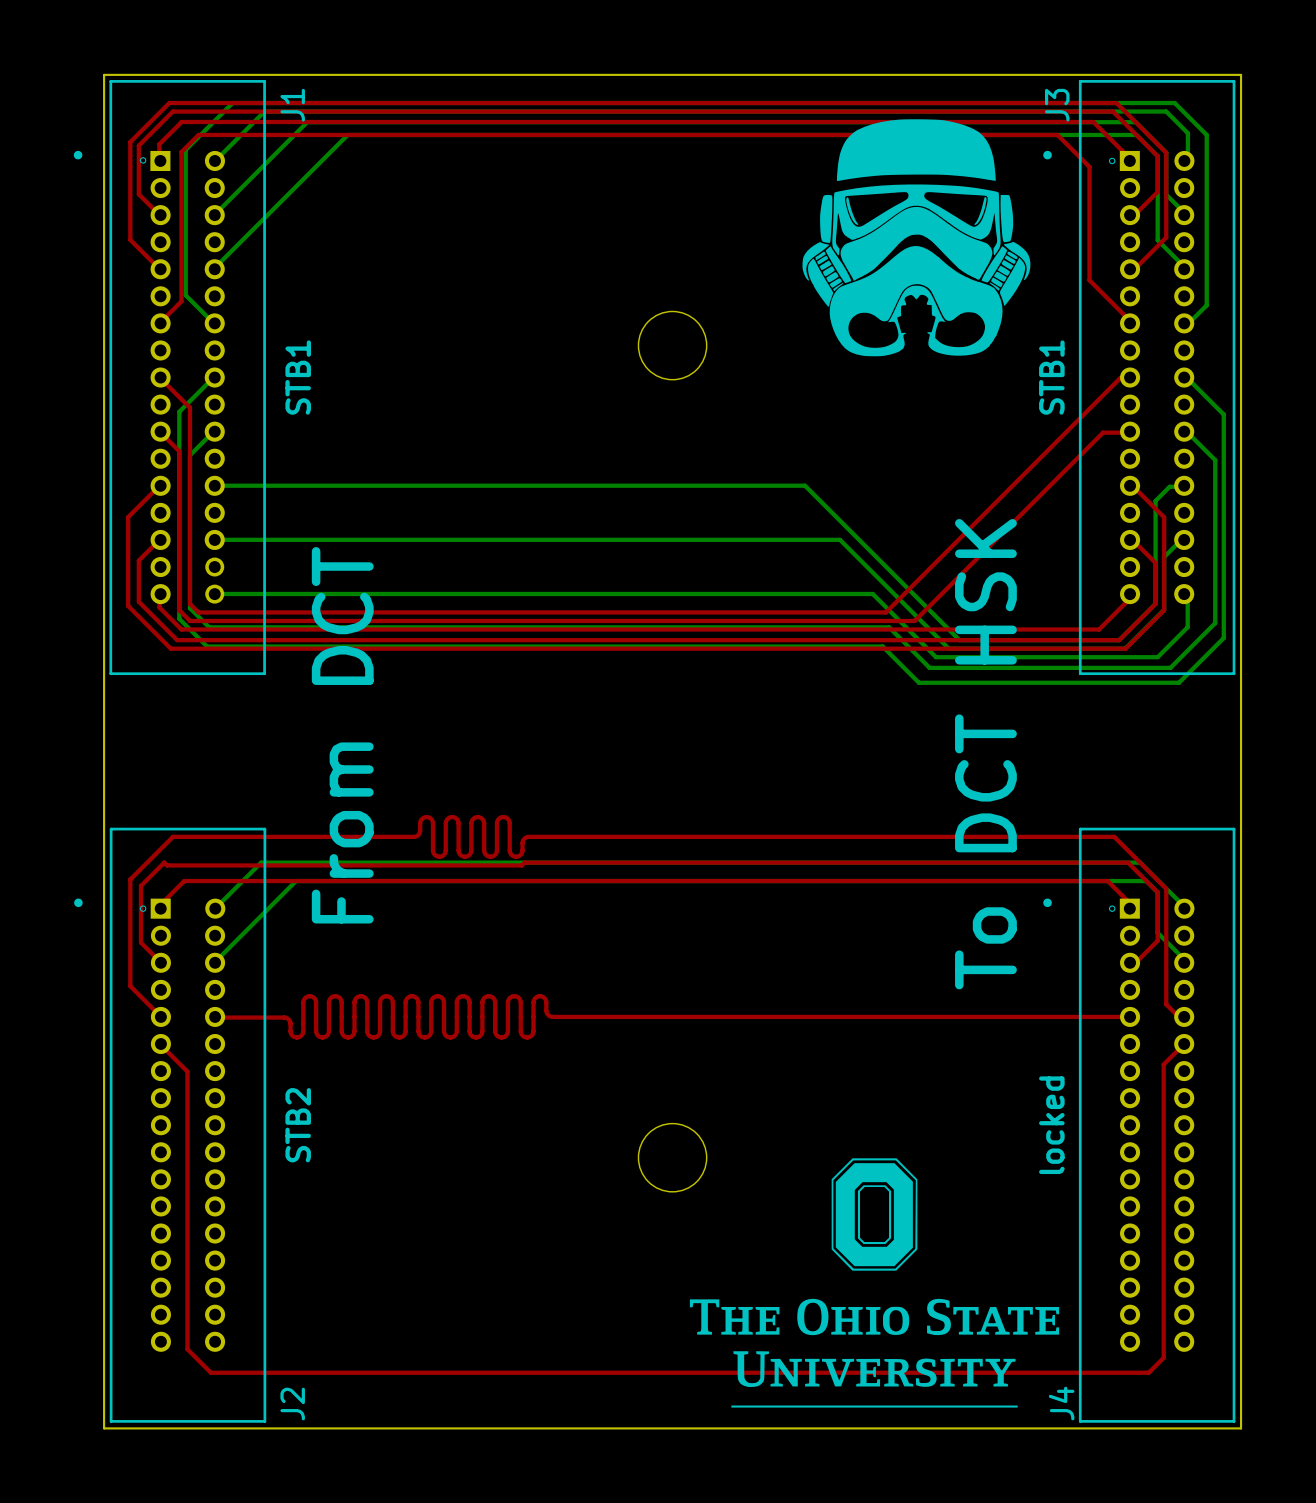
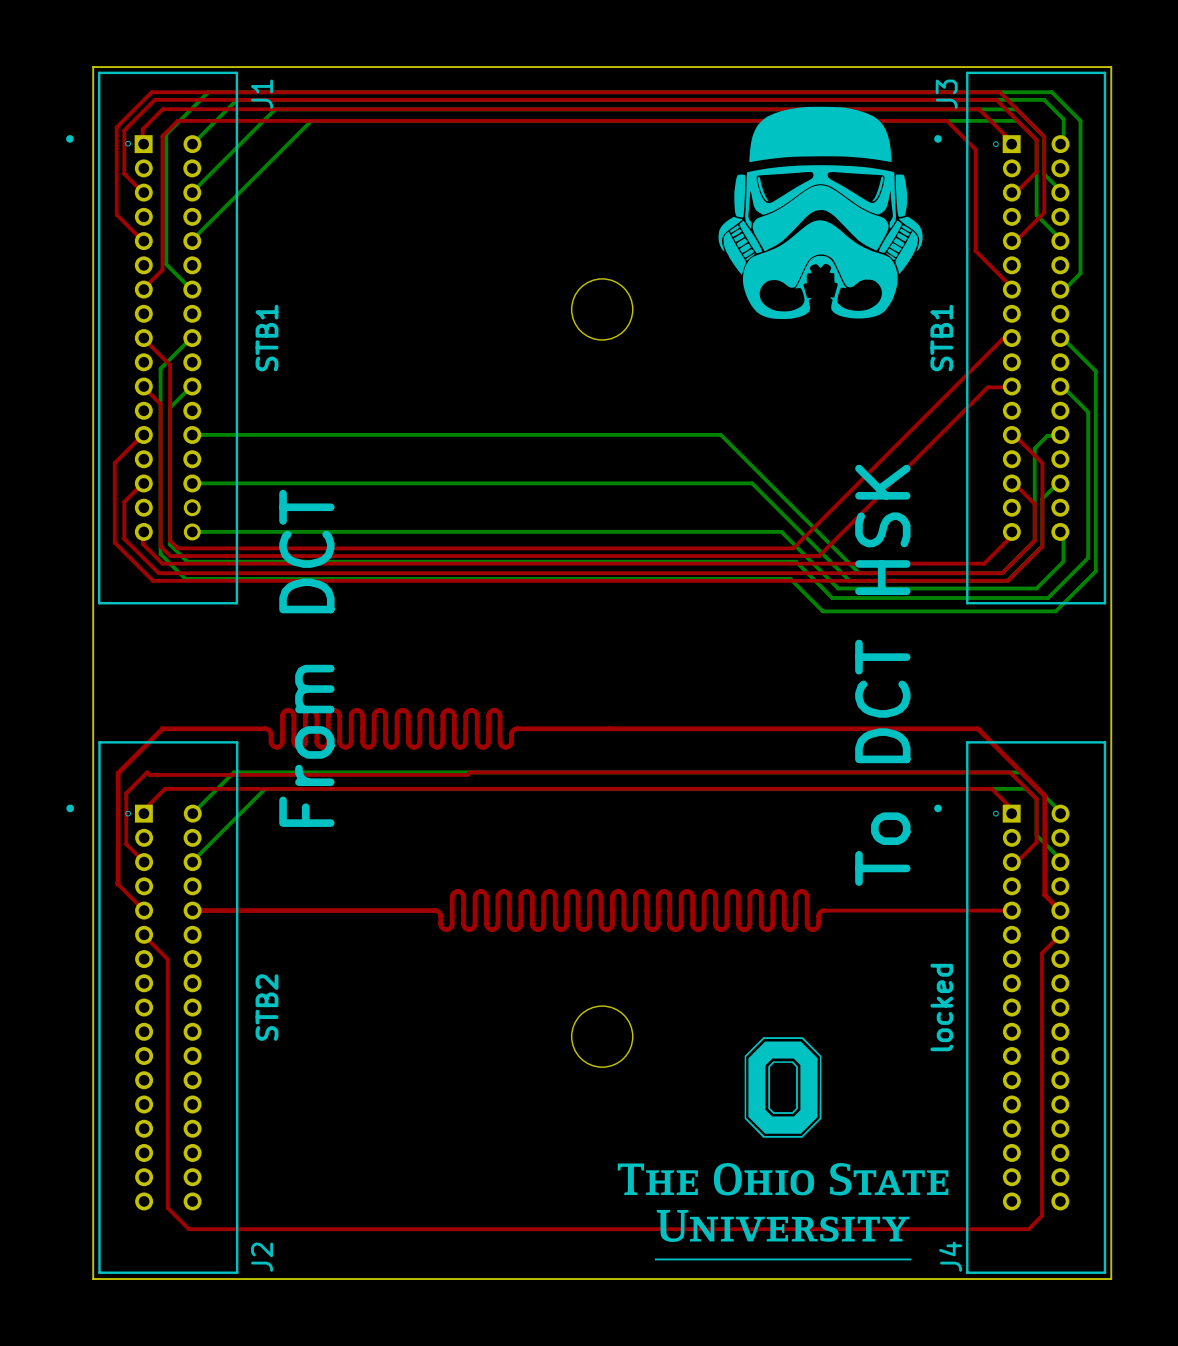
top track: (130, 986) (130, 879) (172, 836) (414, 836) (419, 832) (421, 820) (427, 817) (432, 822) (433, 851) (436, 855) (440, 856) (445, 851) (445, 821) (448, 817) (453, 817) (458, 822) (458, 851) (464, 856) (471, 851) (471, 822) (473, 818) (477, 817) (482, 818) (484, 822) (484, 851) (490, 856) (495, 854) (496, 851) (497, 821) (503, 817) (507, 818) (509, 822) (509, 851) (516, 856) (522, 852) (523, 840) (528, 836) (1114, 836) (1166, 888) (1166, 1004) (1178, 1017) (1189, 1017) -> none
top track: none -> (118, 884) (118, 773) (162, 728) (266, 728) (270, 732) (271, 744) (277, 747) (282, 742) (282, 714) (288, 710) (293, 715) (294, 742) (300, 747) (305, 742) (305, 714) (311, 710) (316, 715) (317, 742) (323, 747) (328, 742) (328, 714) (334, 710) (339, 715) (339, 742) (346, 747) (351, 742) (351, 714) (357, 710) (362, 715) (362, 742) (369, 747) (374, 742) (374, 714) (380, 710) (385, 715) (385, 742) (392, 747) (396, 742) (397, 714) (403, 710) (408, 715) (408, 742) (414, 747) (419, 742) (420, 714) (426, 710) (431, 715) (431, 742) (437, 747) (442, 742) (442, 715) (448, 710) (454, 714) (454, 742) (459, 747) (465, 742) (465, 714) (471, 710) (476, 714) (477, 742) (482, 747) (488, 742) (488, 715) (494, 710) (499, 714) (500, 742) (505, 747) (510, 744) (511, 732) (517, 728) (977, 728) (1044, 795) (1044, 894) (1060, 910)
top track: (552, 1016) (920, 1016) -> (192, 910) (435, 910) (440, 914) (441, 926) (446, 929) (452, 924) (452, 895) (457, 891) (463, 896) (463, 925) (469, 929) (474, 925) (475, 896) (480, 891) (486, 896) (486, 925) (492, 929) (497, 925) (498, 896) (503, 891) (509, 895) (509, 924) (515, 929) (520, 924) (521, 895) (526, 891) (532, 896) (532, 925) (538, 929) (543, 925) (543, 896) (548, 891) (555, 895) (555, 924) (560, 929) (566, 925) (566, 896) (571, 891) (577, 895) (578, 924) (583, 929) (589, 925) (589, 896) (594, 891) (600, 895) (601, 924) (606, 929) (612, 925) (612, 896) (617, 891) (623, 895) (623, 924) (628, 929) (635, 925) (635, 896) (640, 891) (646, 895) (646, 924) (651, 929) (658, 925) (658, 896) (663, 891) (669, 895) (669, 924) (674, 929) (680, 925) (681, 896) (686, 891) (692, 895) (692, 924) (697, 929) (703, 925) (704, 896) (709, 891) (715, 895) (715, 924) (720, 929) (726, 925) (727, 896) (731, 891) (738, 895) (738, 924) (742, 929) (747, 928) (749, 925) (749, 896) (754, 891) (758, 892) (761, 895) (761, 924) (765, 929) (769, 928) (772, 925) (772, 896) (777, 891) (781, 892) (784, 895) (784, 924) (787, 929) (792, 929) (795, 925) (795, 896) (798, 892) (803, 891) (806, 895) (807, 924) (809, 928) (813, 929) (817, 927) (819, 914) (824, 910)
top track: (552, 1016) (546, 1012) (544, 998) (540, 996) (536, 997) (533, 1001) (533, 1032) (529, 1037) (523, 1036) (520, 1031) (520, 1000) (516, 996) (511, 996) (508, 1001) (507, 1032) (504, 1036) (499, 1037) (495, 1031) (494, 1000) (491, 997) (487, 996) (482, 1001) (482, 1032) (479, 1036) (474, 1037) (469, 1031) (469, 1000) (466, 997) (461, 996) (456, 1001) (456, 1032) (453, 1036) (449, 1037) (444, 1031) (443, 1000) (440, 997) (436, 996) (431, 1001) (430, 1032) (428, 1036) (423, 1037) (418, 1031) (418, 1000) (415, 997) (411, 996) (405, 1001) (405, 1032) (402, 1036) (398, 1037) (392, 1031) (392, 1000) (389, 997) (385, 996) (380, 1001) (379, 1032) (376, 1036) (372, 1037) (367, 1031) (367, 1000) (364, 997) (360, 996) (354, 1001) (354, 1032) (351, 1036) (347, 1037) (341, 1031) (341, 1000) (338, 997) (334, 996) (328, 1001) (328, 1032) (325, 1036) (321, 1037) (316, 1031) (315, 1000) (309, 996) (303, 1000) (303, 1031) (300, 1036) (296, 1037) (291, 1034) (290, 1023) -> none
top track: (215, 1017) (284, 1017) (289, 1020) (290, 1023) -> none

